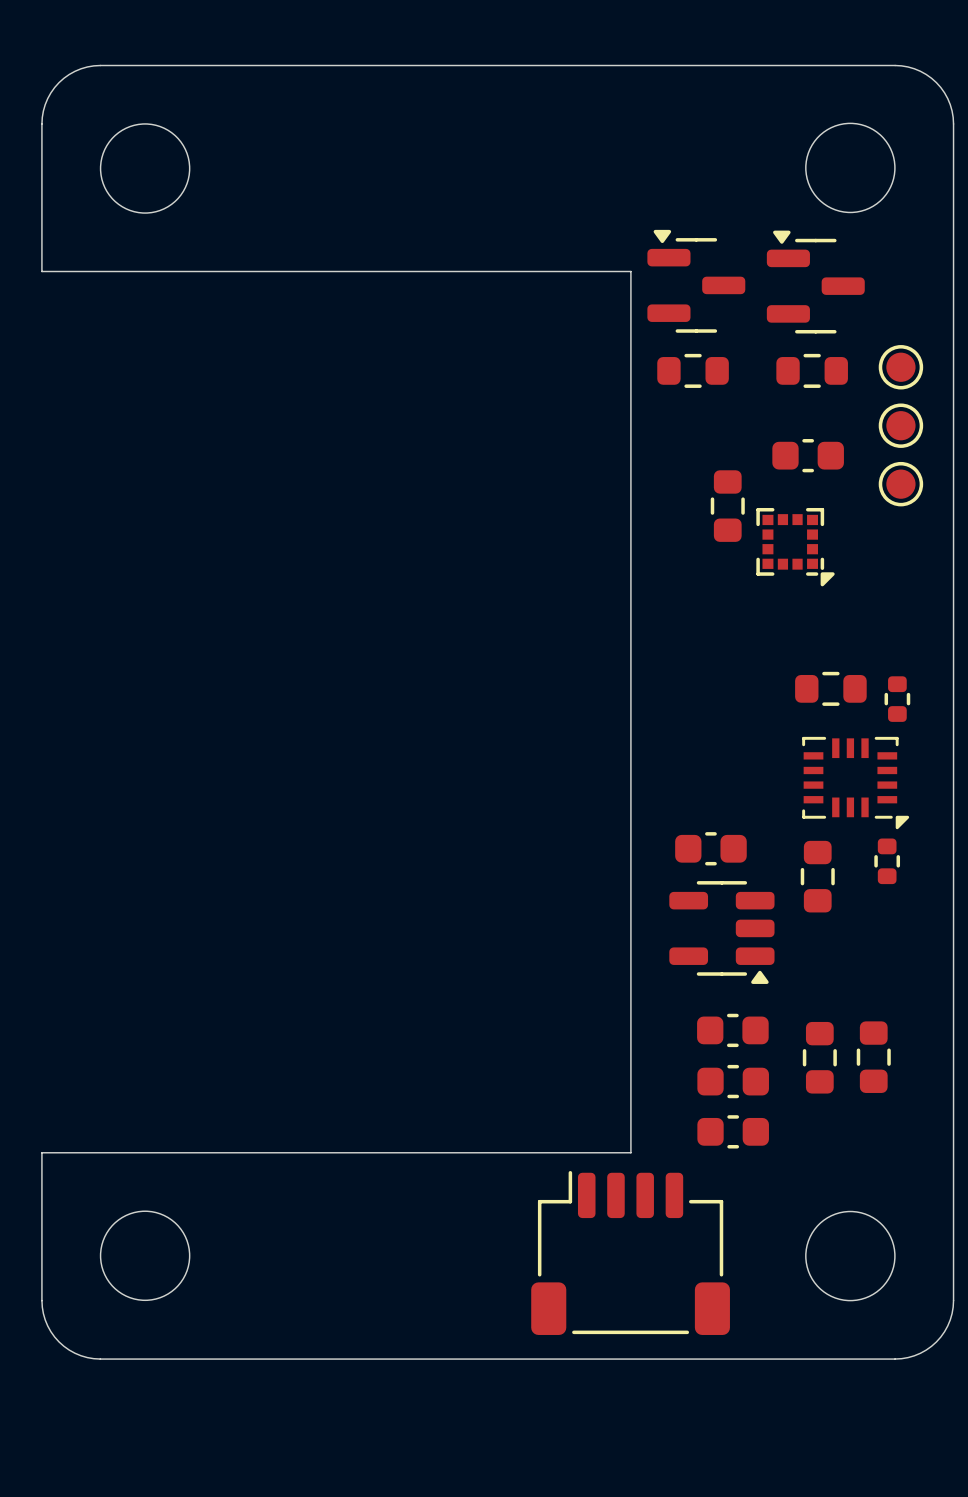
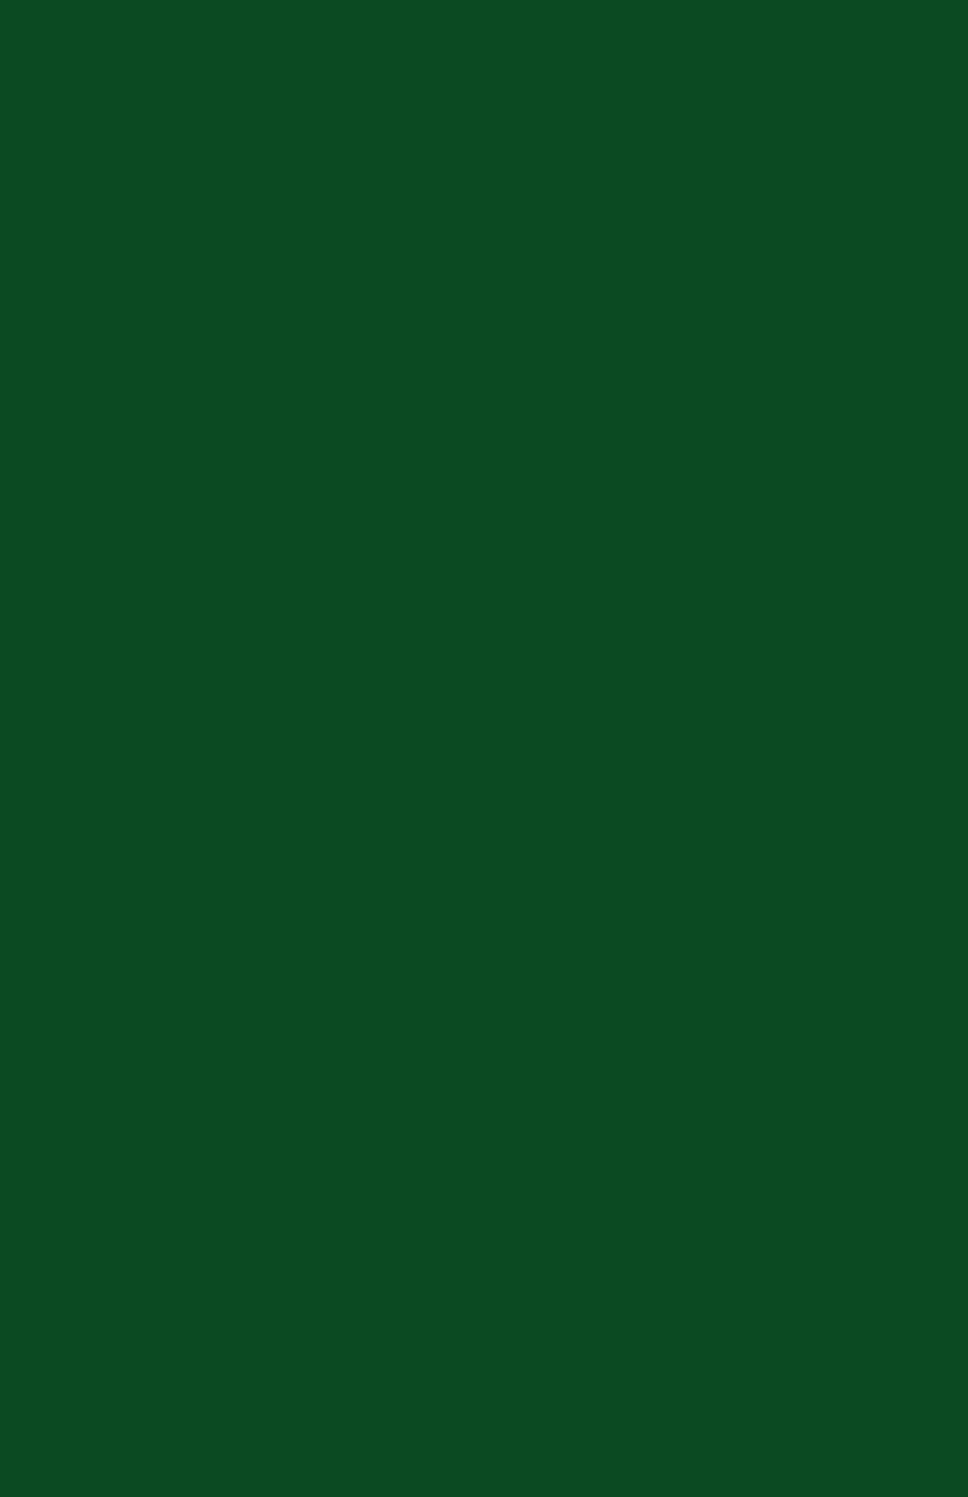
board edge: (100, 65) (895, 65) (920, 71) (931, 78) (944, 92) (950, 104) (953, 123) (953, 1300) (947, 1325) (940, 1337) (926, 1350) (914, 1355) (895, 1359) (100, 1359) (75, 1353) (63, 1346) (50, 1331) (45, 1319) (41, 1300) (41, 1152) (630, 1152) (630, 271) (41, 271) (43, 110) (50, 92) (63, 78) (81, 68) (100, 65) -> none
round board edge: [805, 122, 896, 214] -> none
round board edge: [99, 123, 191, 214] -> none
part: (696, 281) -> none
part: (815, 282) -> none
part: (900, 367) -> none
part: (693, 370) -> none
part: (812, 370) -> none
part: (900, 425) -> none
part: (808, 455) -> none
part: (900, 484) -> none
part: (727, 506) -> none
part: (795, 547) -> none
part: (830, 688) -> none
part: (897, 699) -> none
part: (855, 783) -> none
part: (710, 848) -> none
part: (887, 861) -> none
part: (817, 876) -> none
part: (721, 932) -> none
part: (732, 1030) -> none
part: (819, 1057) -> none
part: (873, 1057) -> none
part: (733, 1081) -> none
part: (733, 1131) -> none
round board edge: [99, 1210, 191, 1302] -> none
round board edge: [805, 1210, 896, 1302] -> none
part: (630, 1252) -> none

